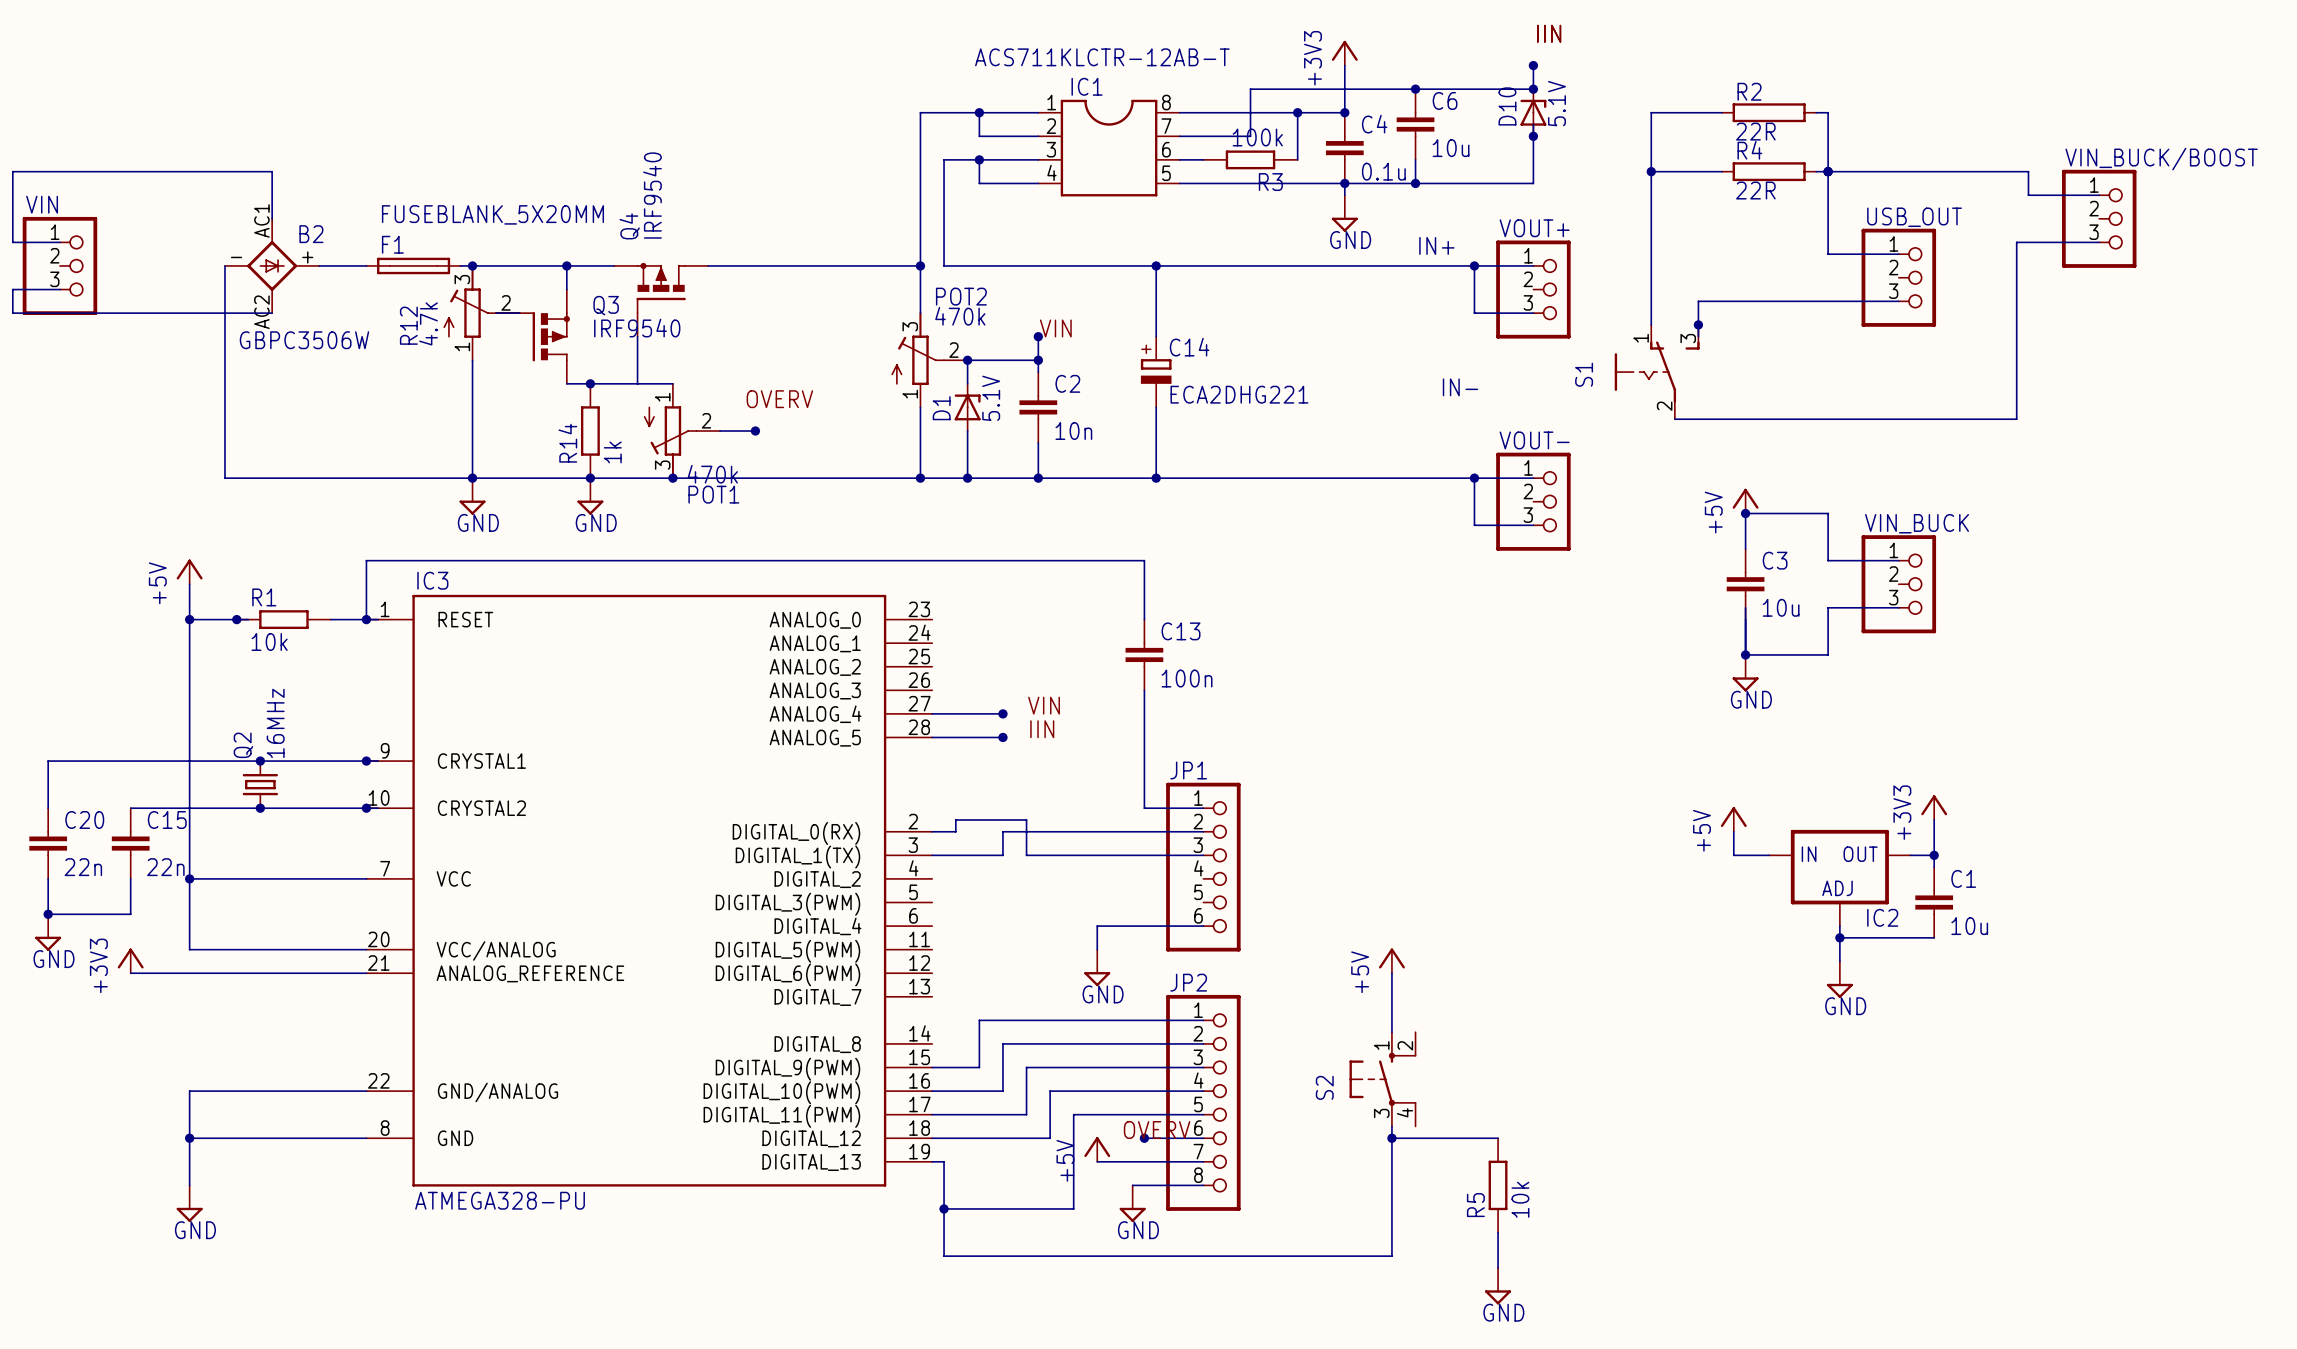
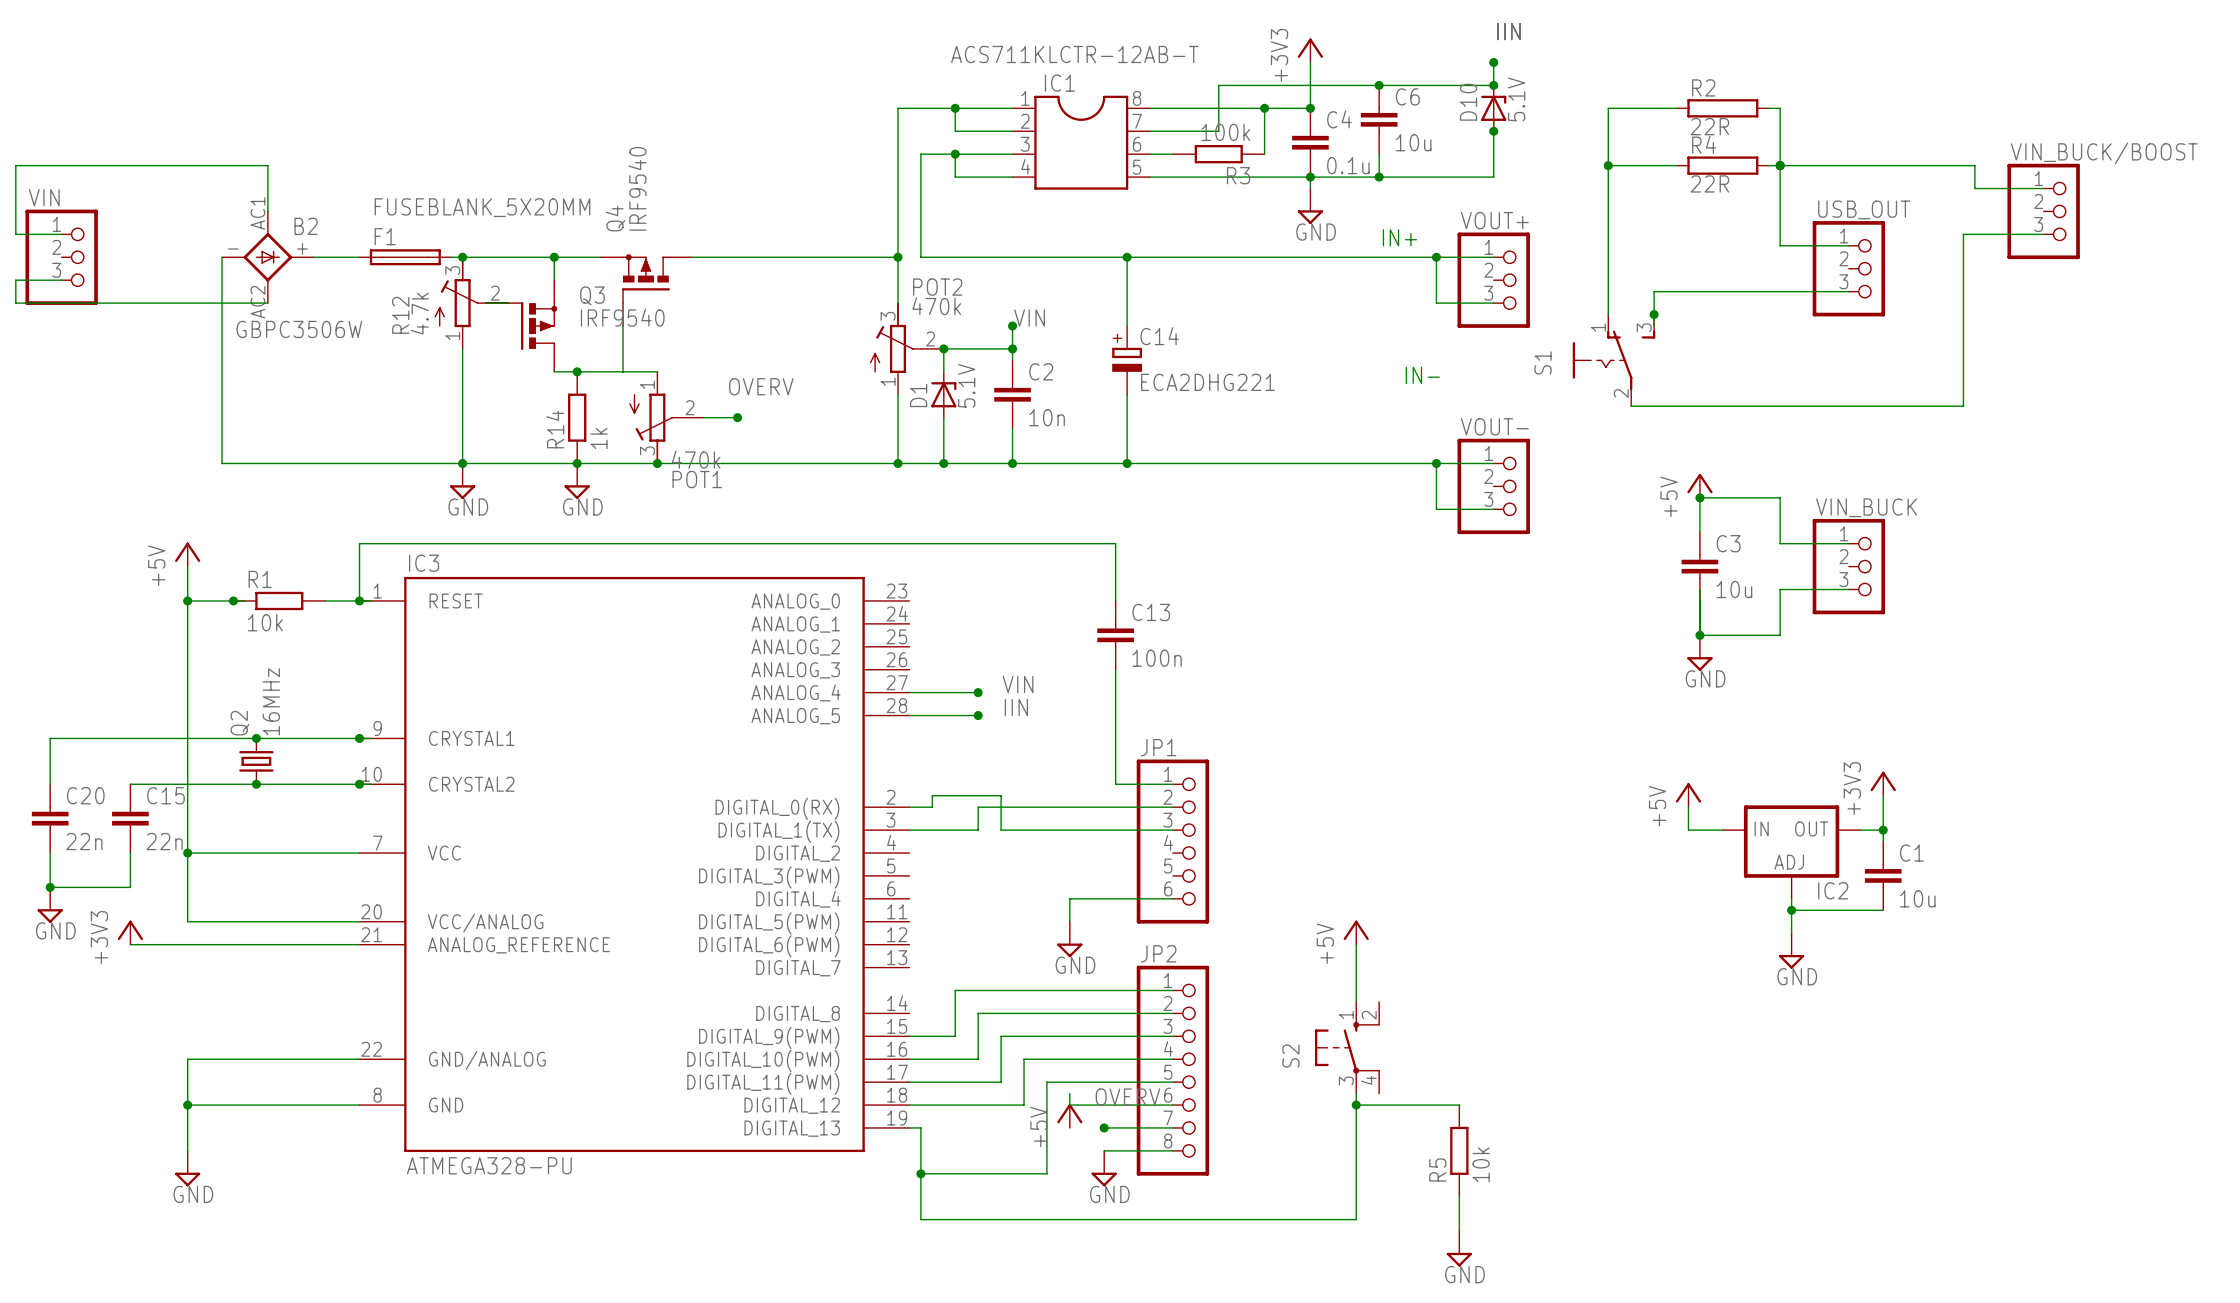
wire: none -> (1069, 1093) (1069, 1105) (1115, 1105)
junction position: (1144, 1138) -> (1104, 1127)
wire: (1097, 1161) (1132, 1161) -> none

